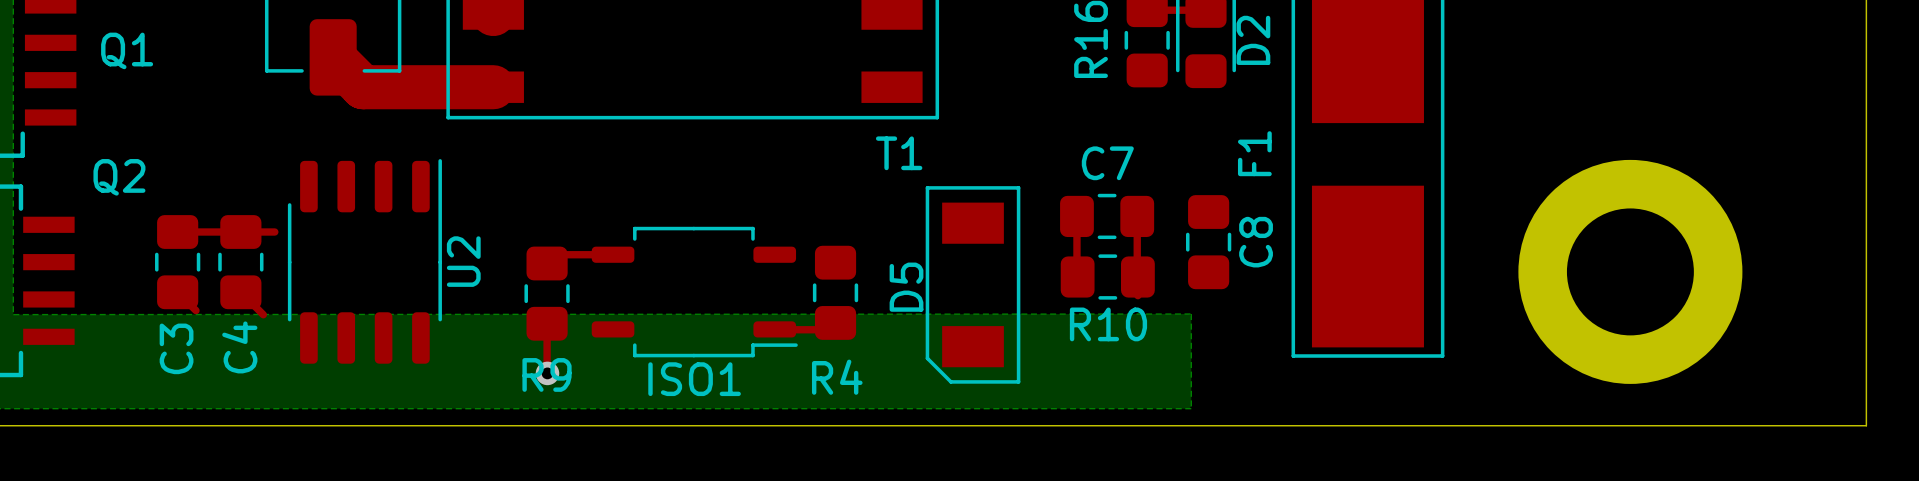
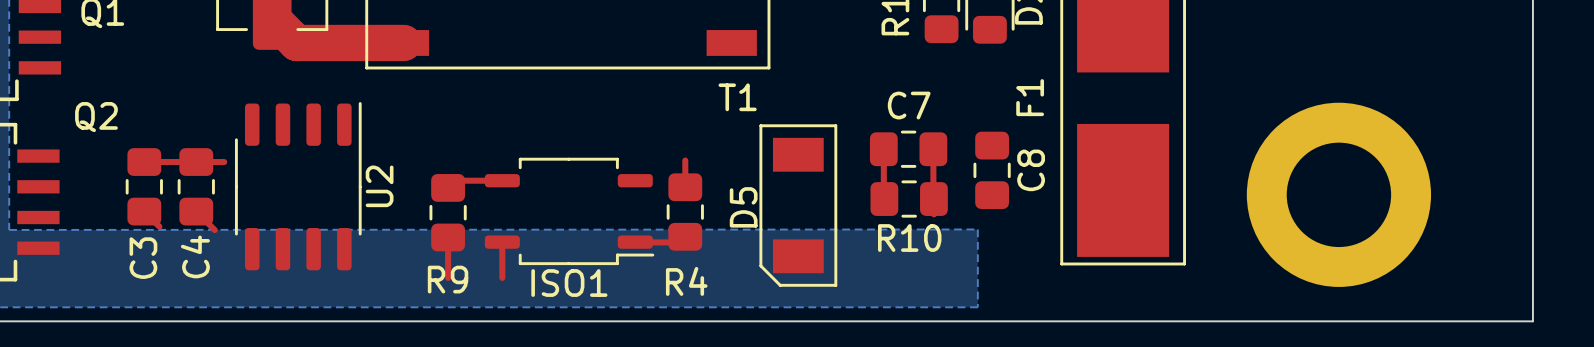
top track: none -> (685, 160) (685, 187)
top track: none -> (502, 242) (502, 277)
via: (547, 373) -> none

